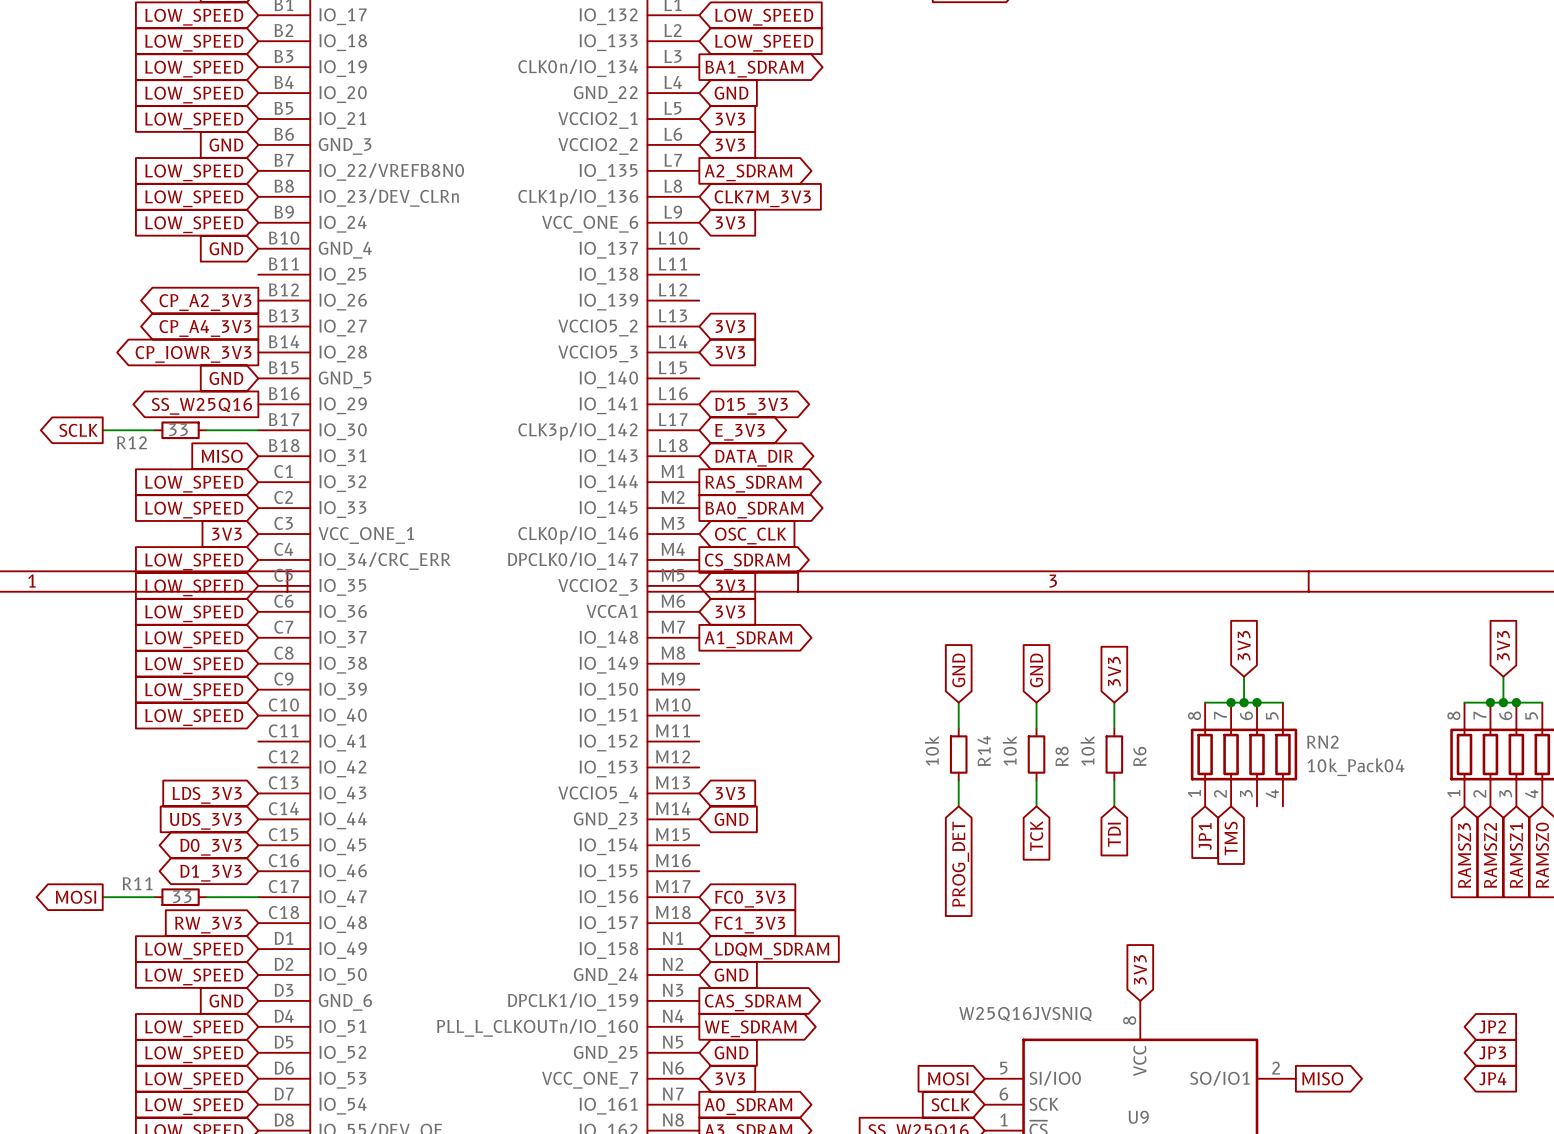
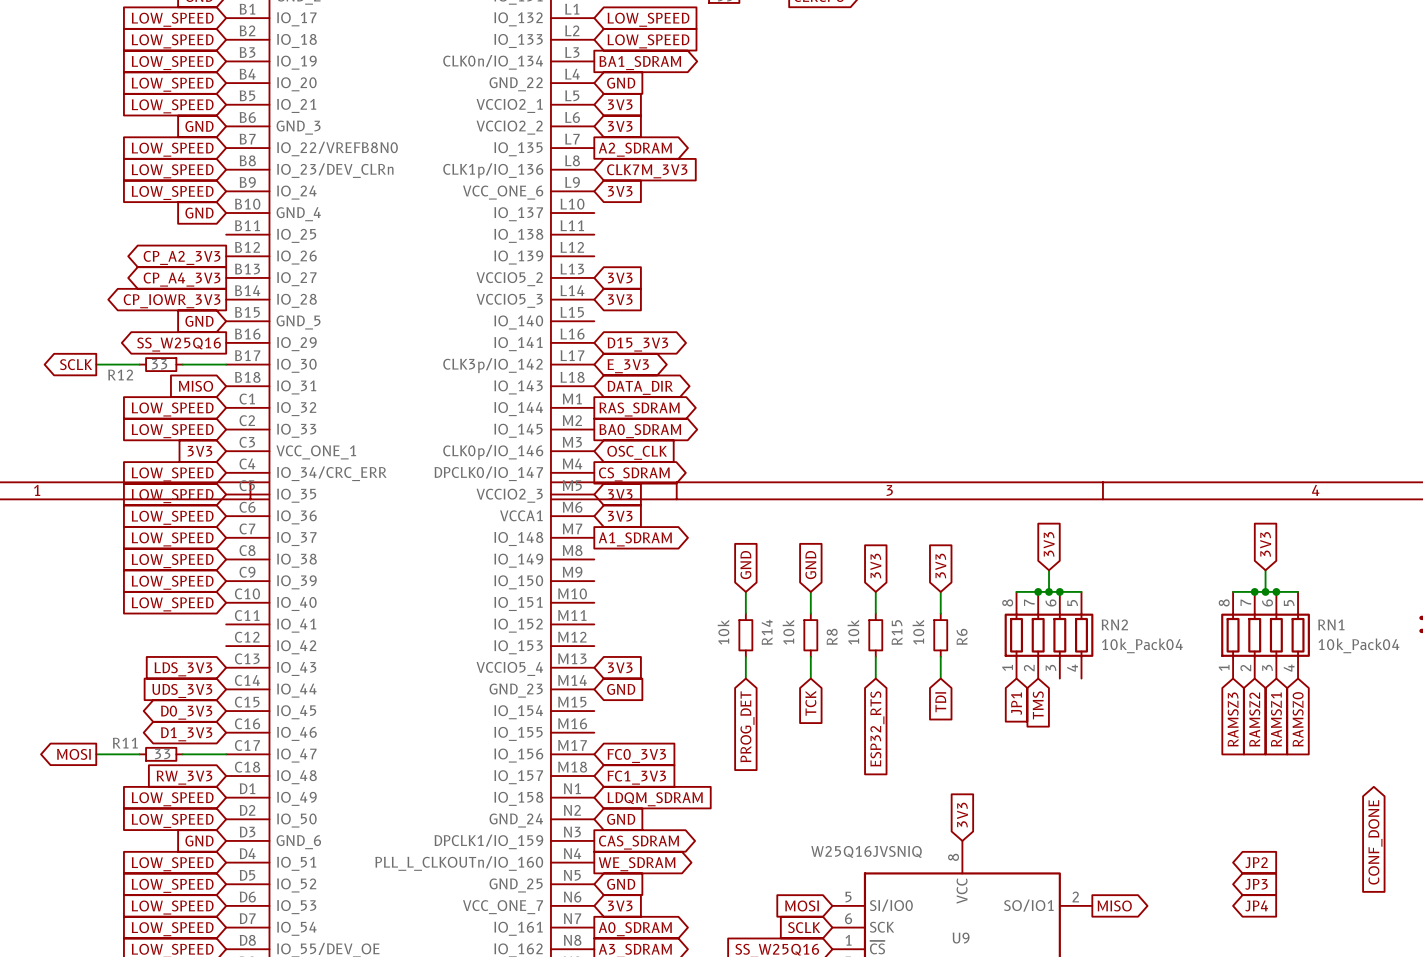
global label: none -> GND (745, 565)
global label: GND (1036, 670) -> 3V3 (875, 566)
wire: none -> (745, 591) (745, 613)
R14 name: R14 (984, 751) -> R8 (832, 636)
R14: none -> 10k (745, 635)
R8 name: R8 (1062, 756) -> R15 (897, 632)
wire: none -> (745, 656) (745, 678)
global label: TCK (1036, 836) -> ESP32_RTS (877, 728)
global label: none -> PROG_DET (747, 726)
global label: PROG_DET (960, 864) -> TCK (810, 703)

